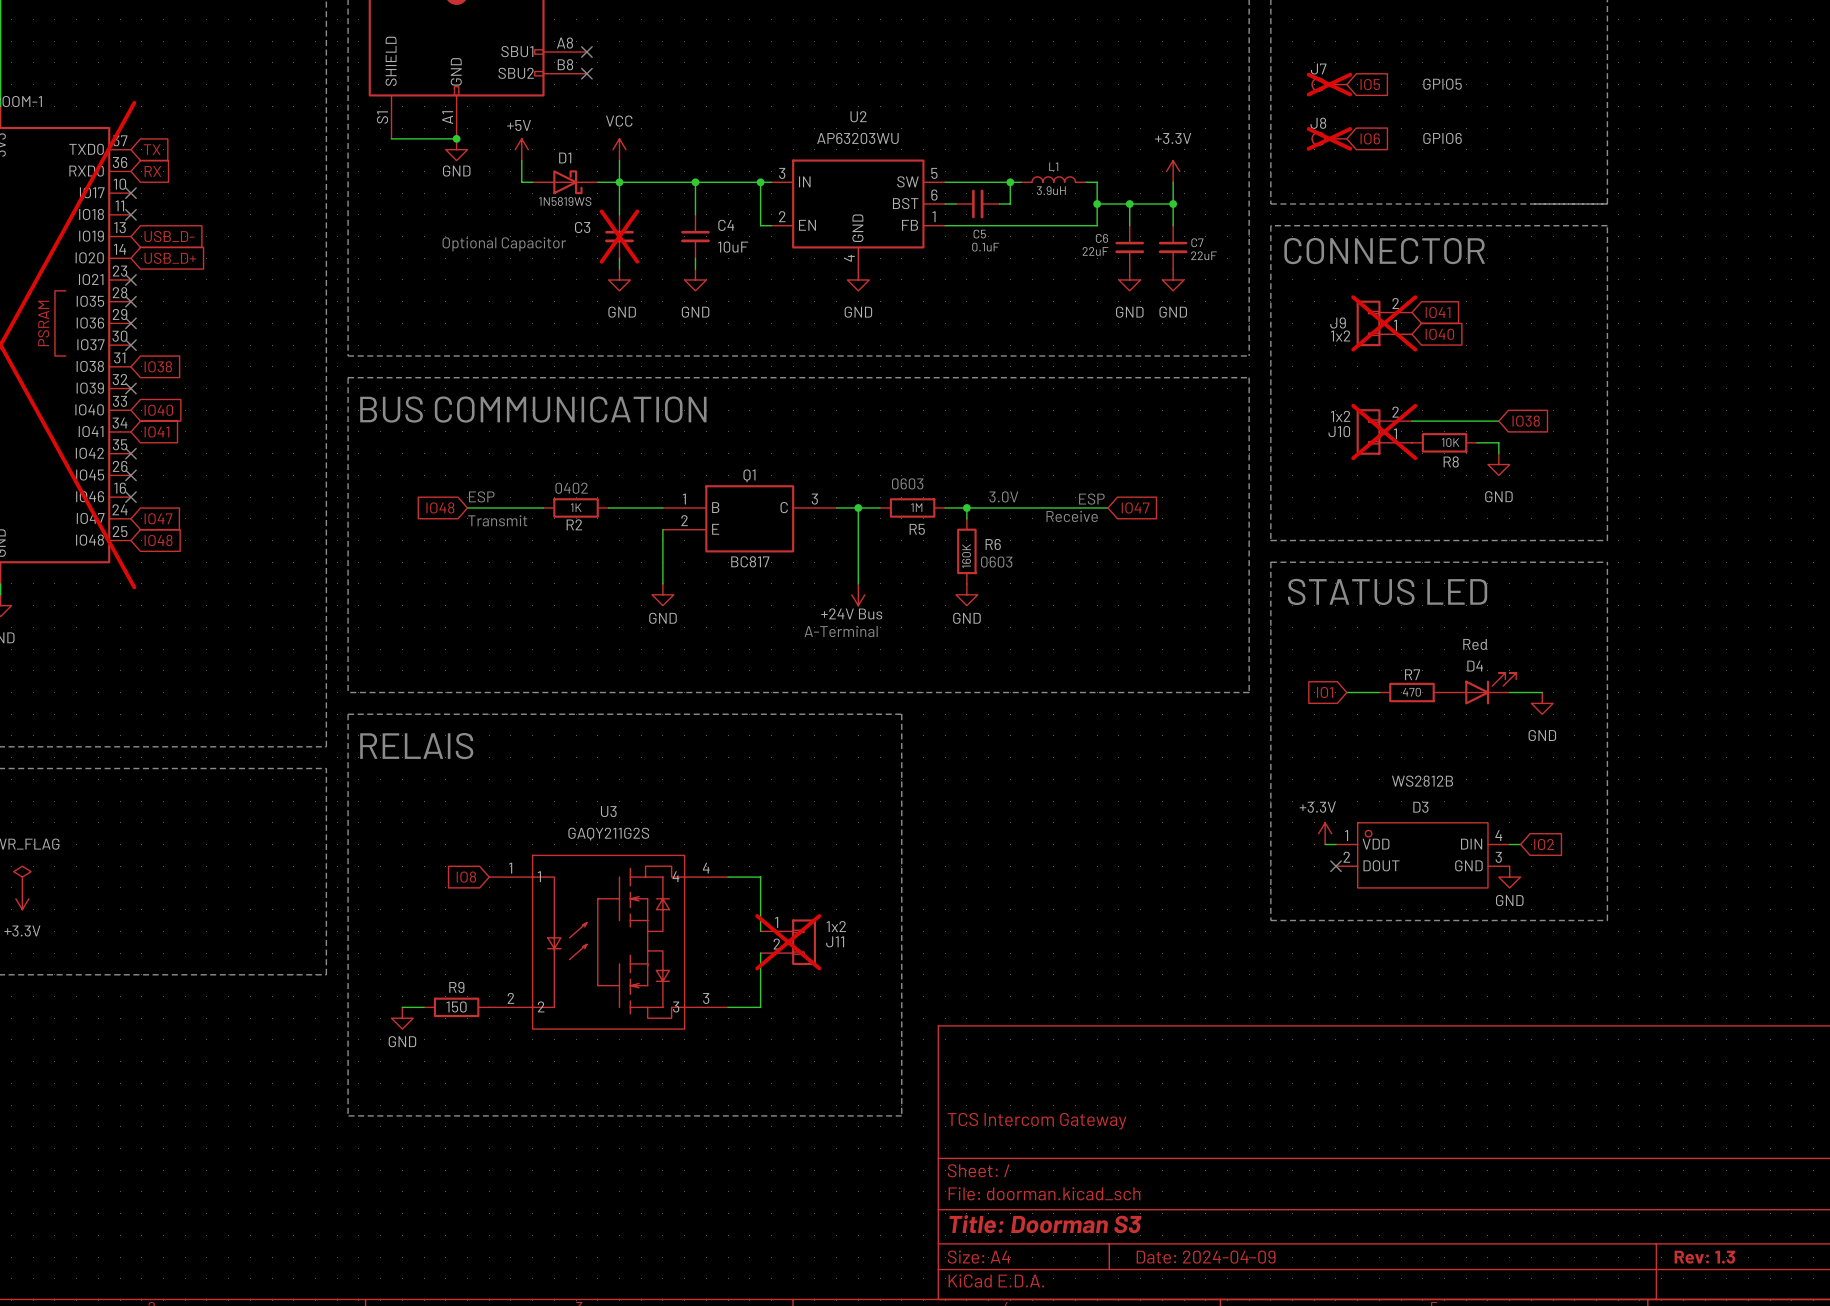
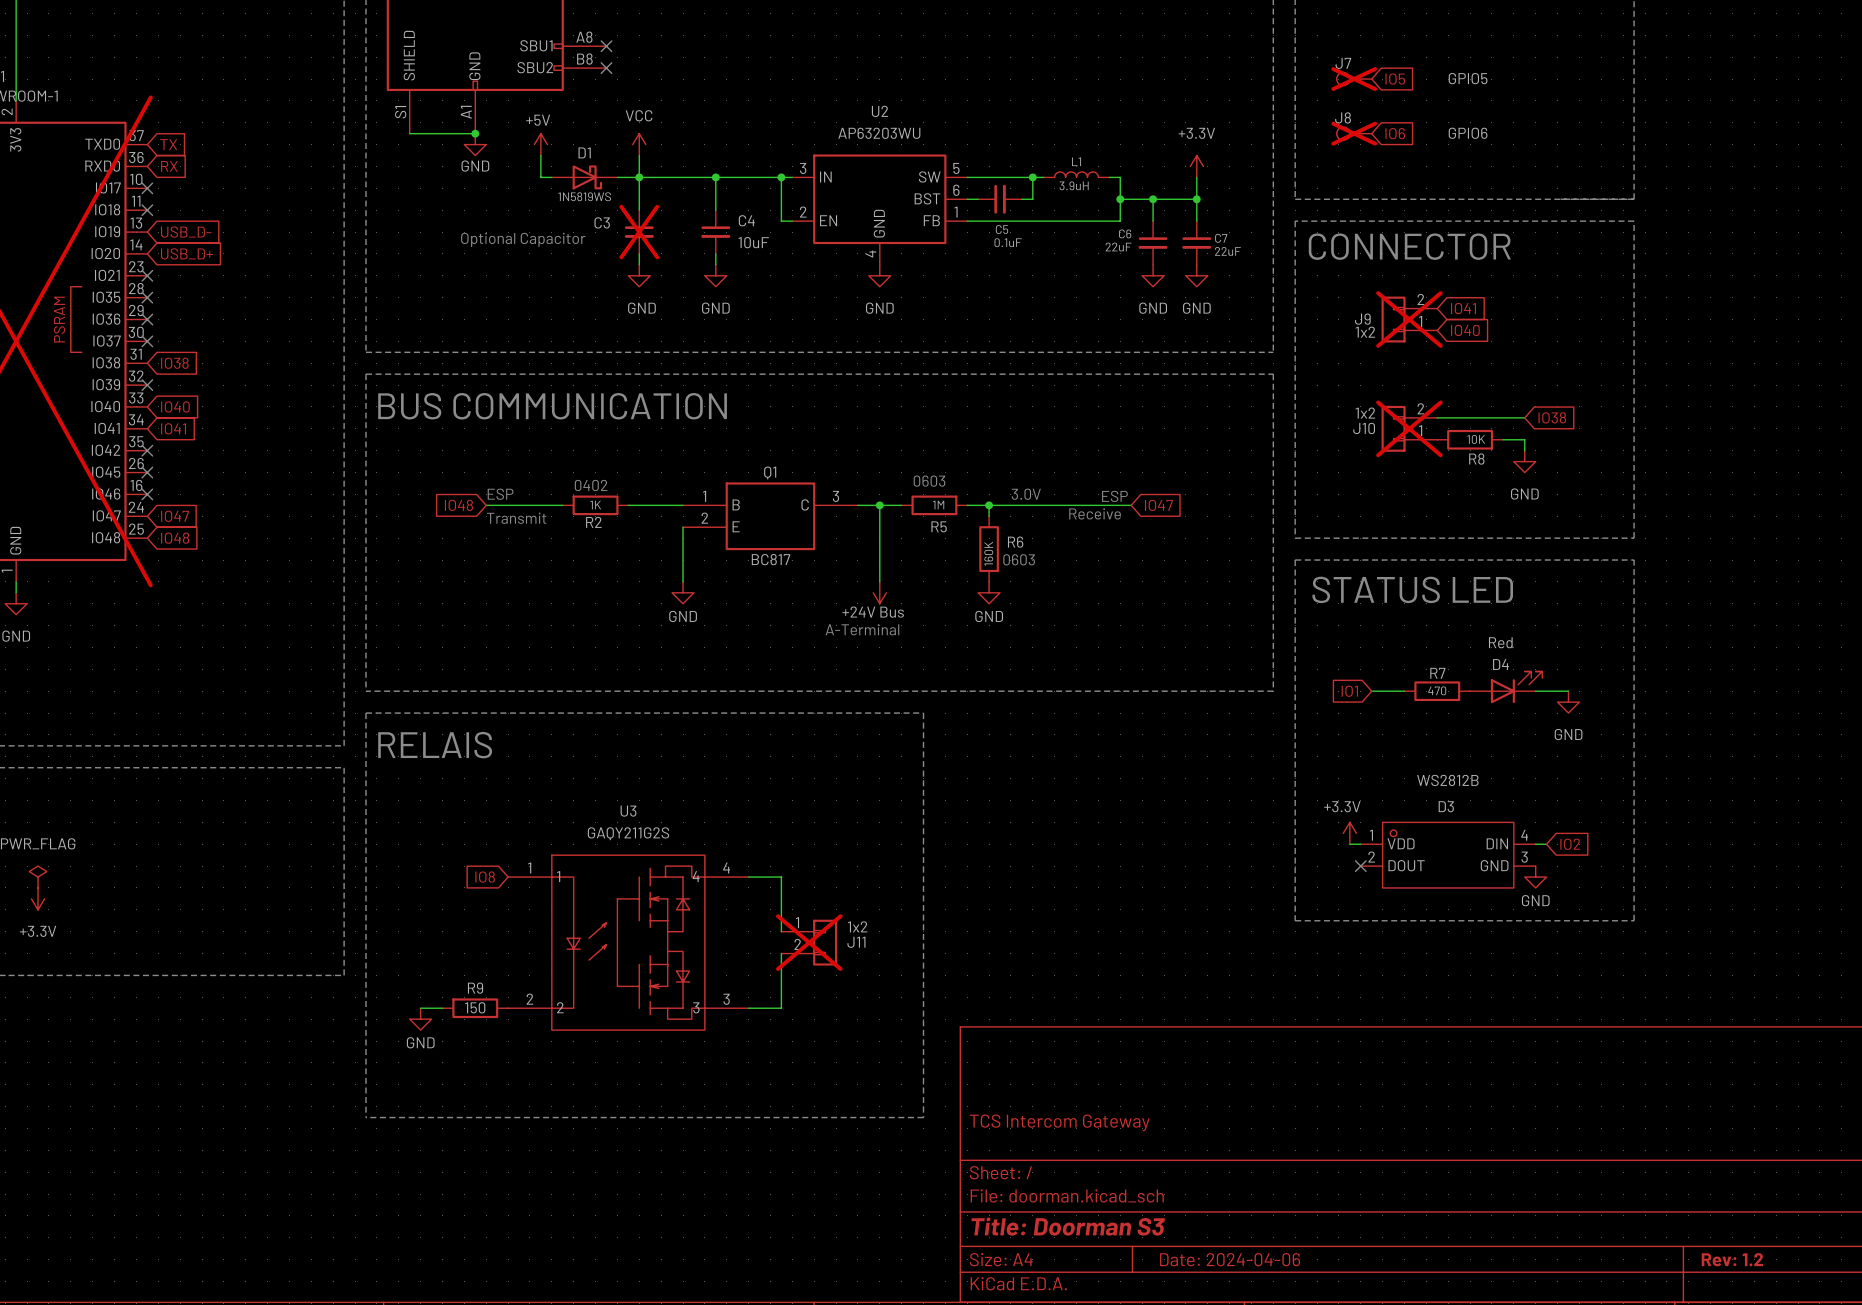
title block: Date: 2024-04-09 (1206, 1257) -> Date: 2024-04-06 (1230, 1259)
title block: Rev: 1.3 (1704, 1257) -> Rev: 1.2 (1732, 1259)

